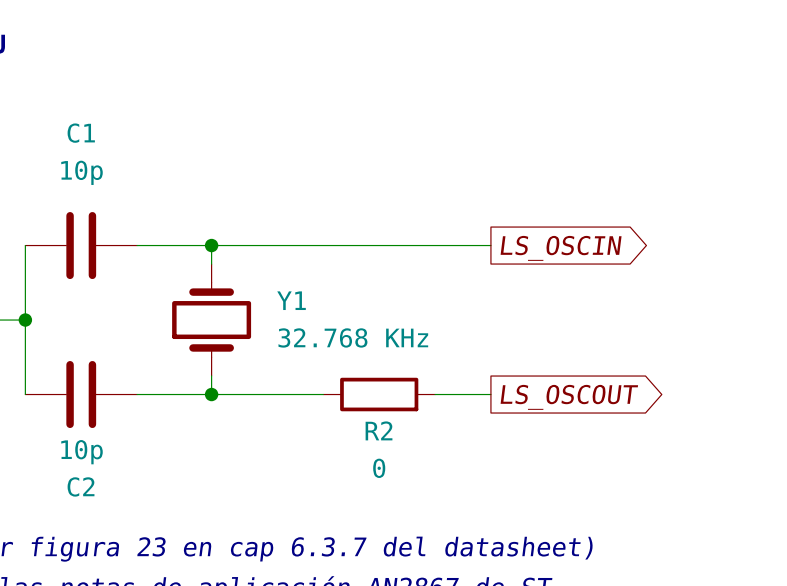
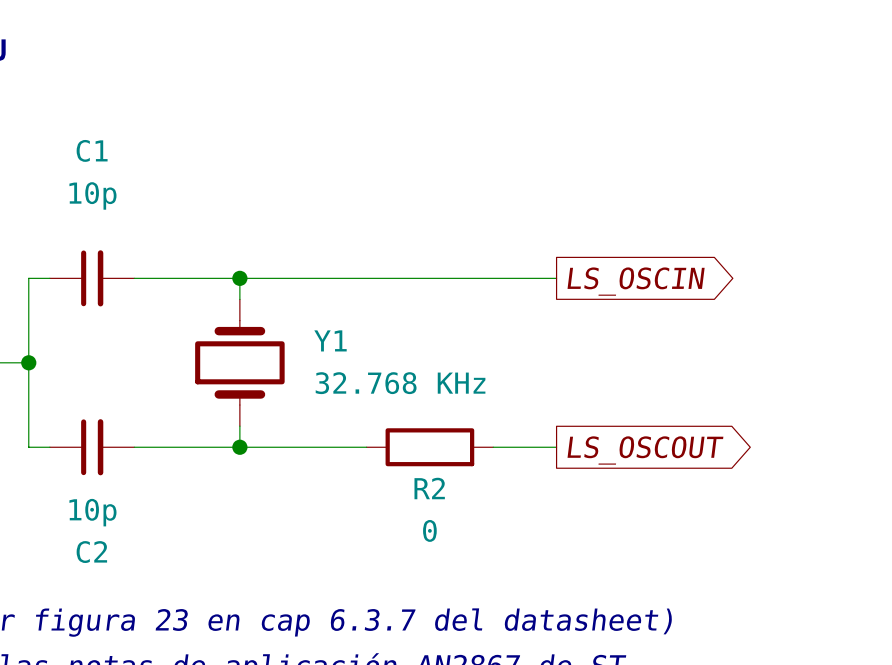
C1 symbol: [25, 212, 138, 280] -> [49, 250, 135, 307]
C2 symbol: [25, 361, 138, 429] -> [49, 419, 135, 476]

